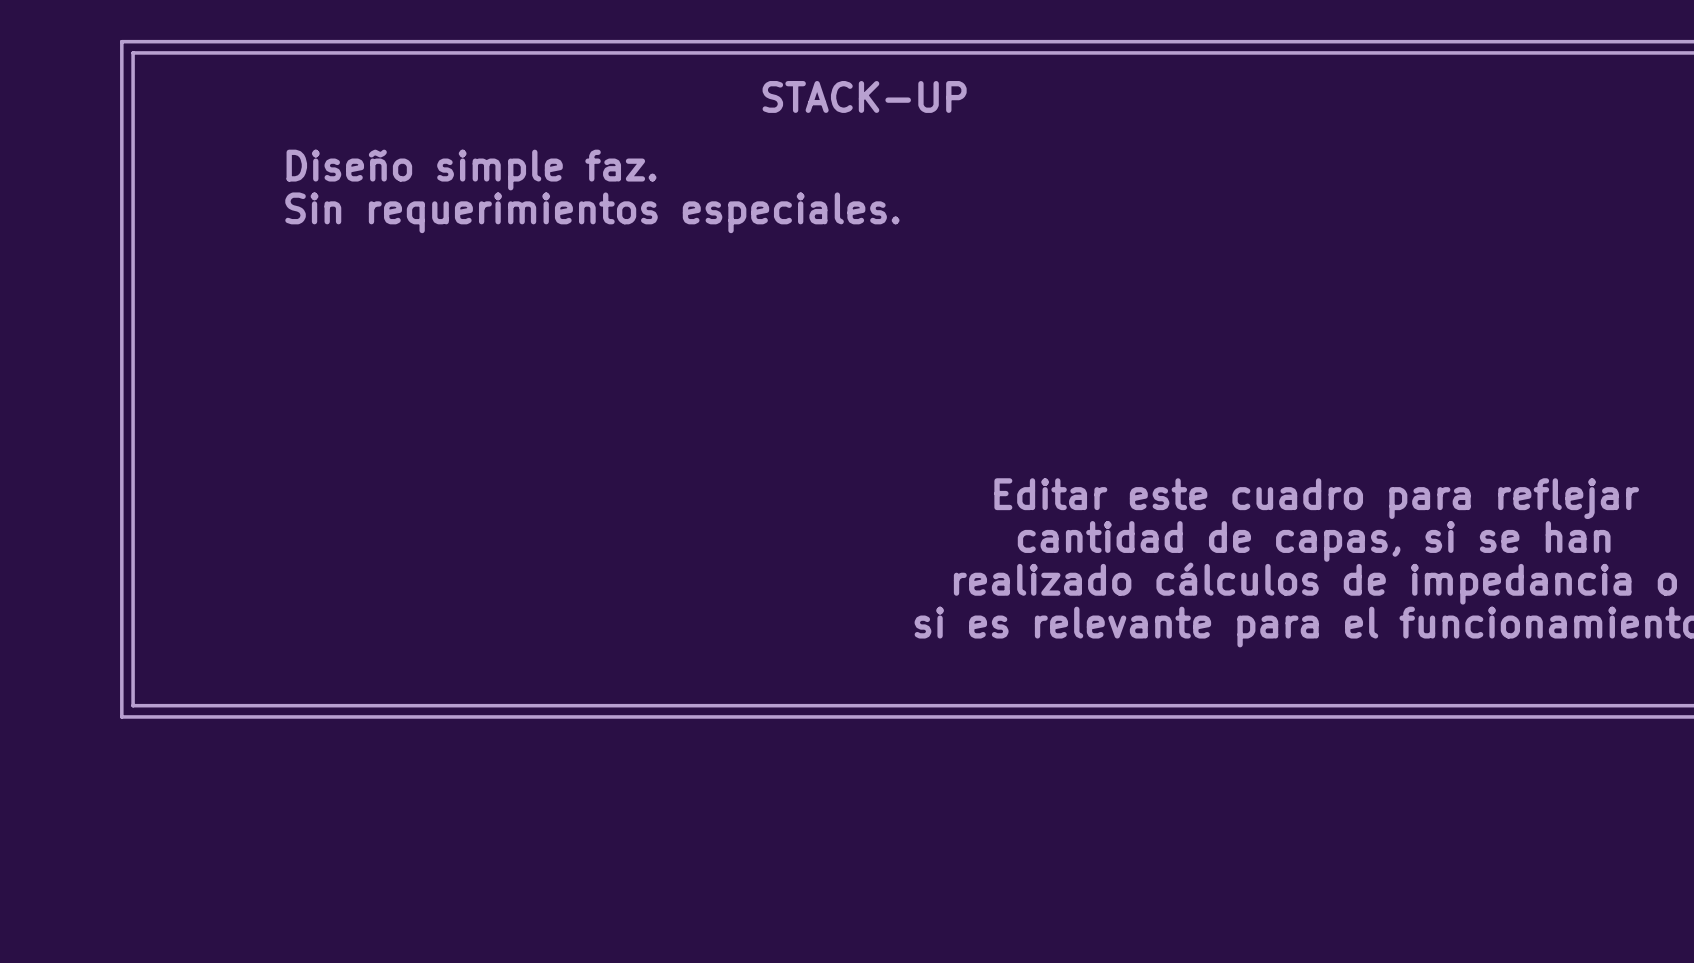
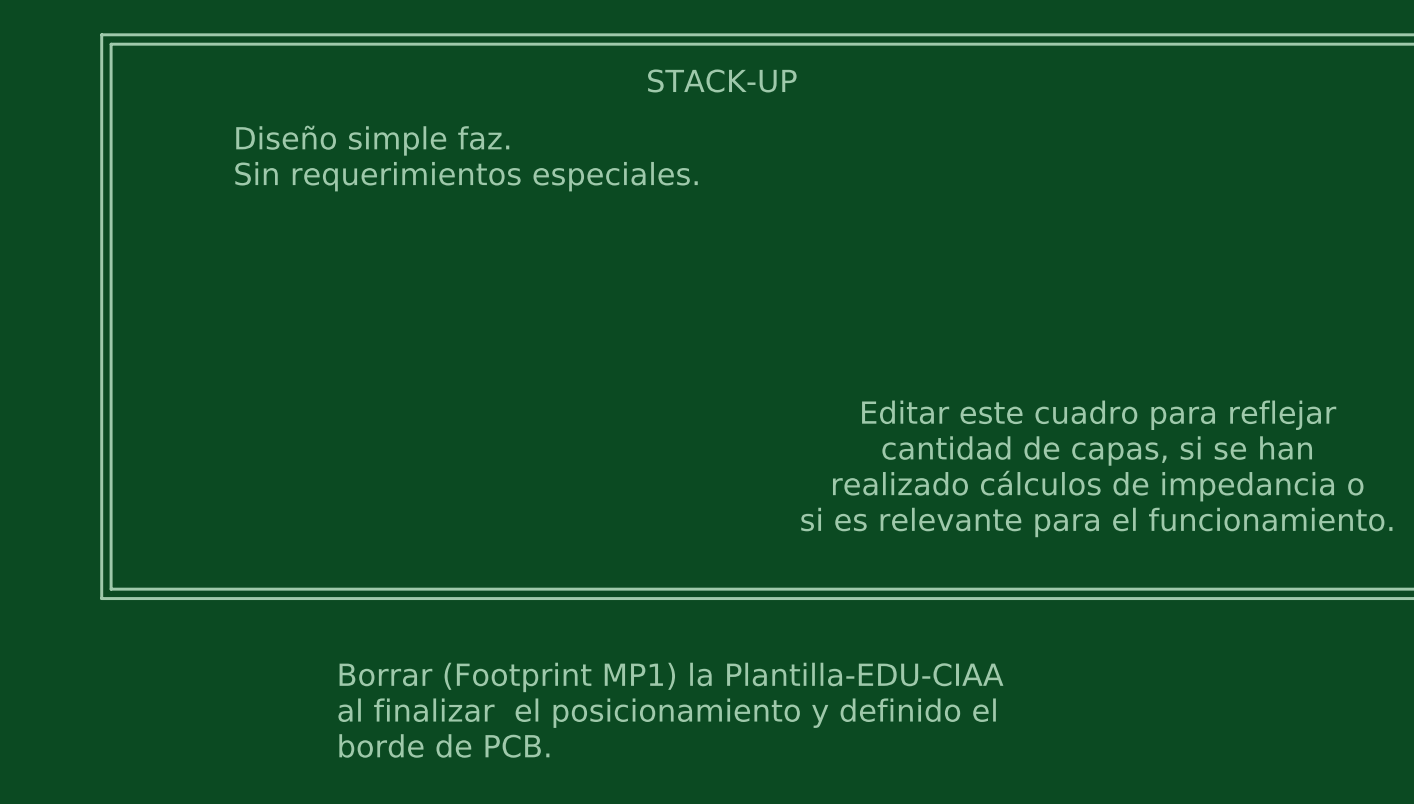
text: none -> Borrar (Footprint MP1) la Plantilla-EDU-CIAA (671, 677)
text: none -> al finalizar el posicionamiento y definido el (667, 713)
text: none -> borde de PCB. (444, 745)

